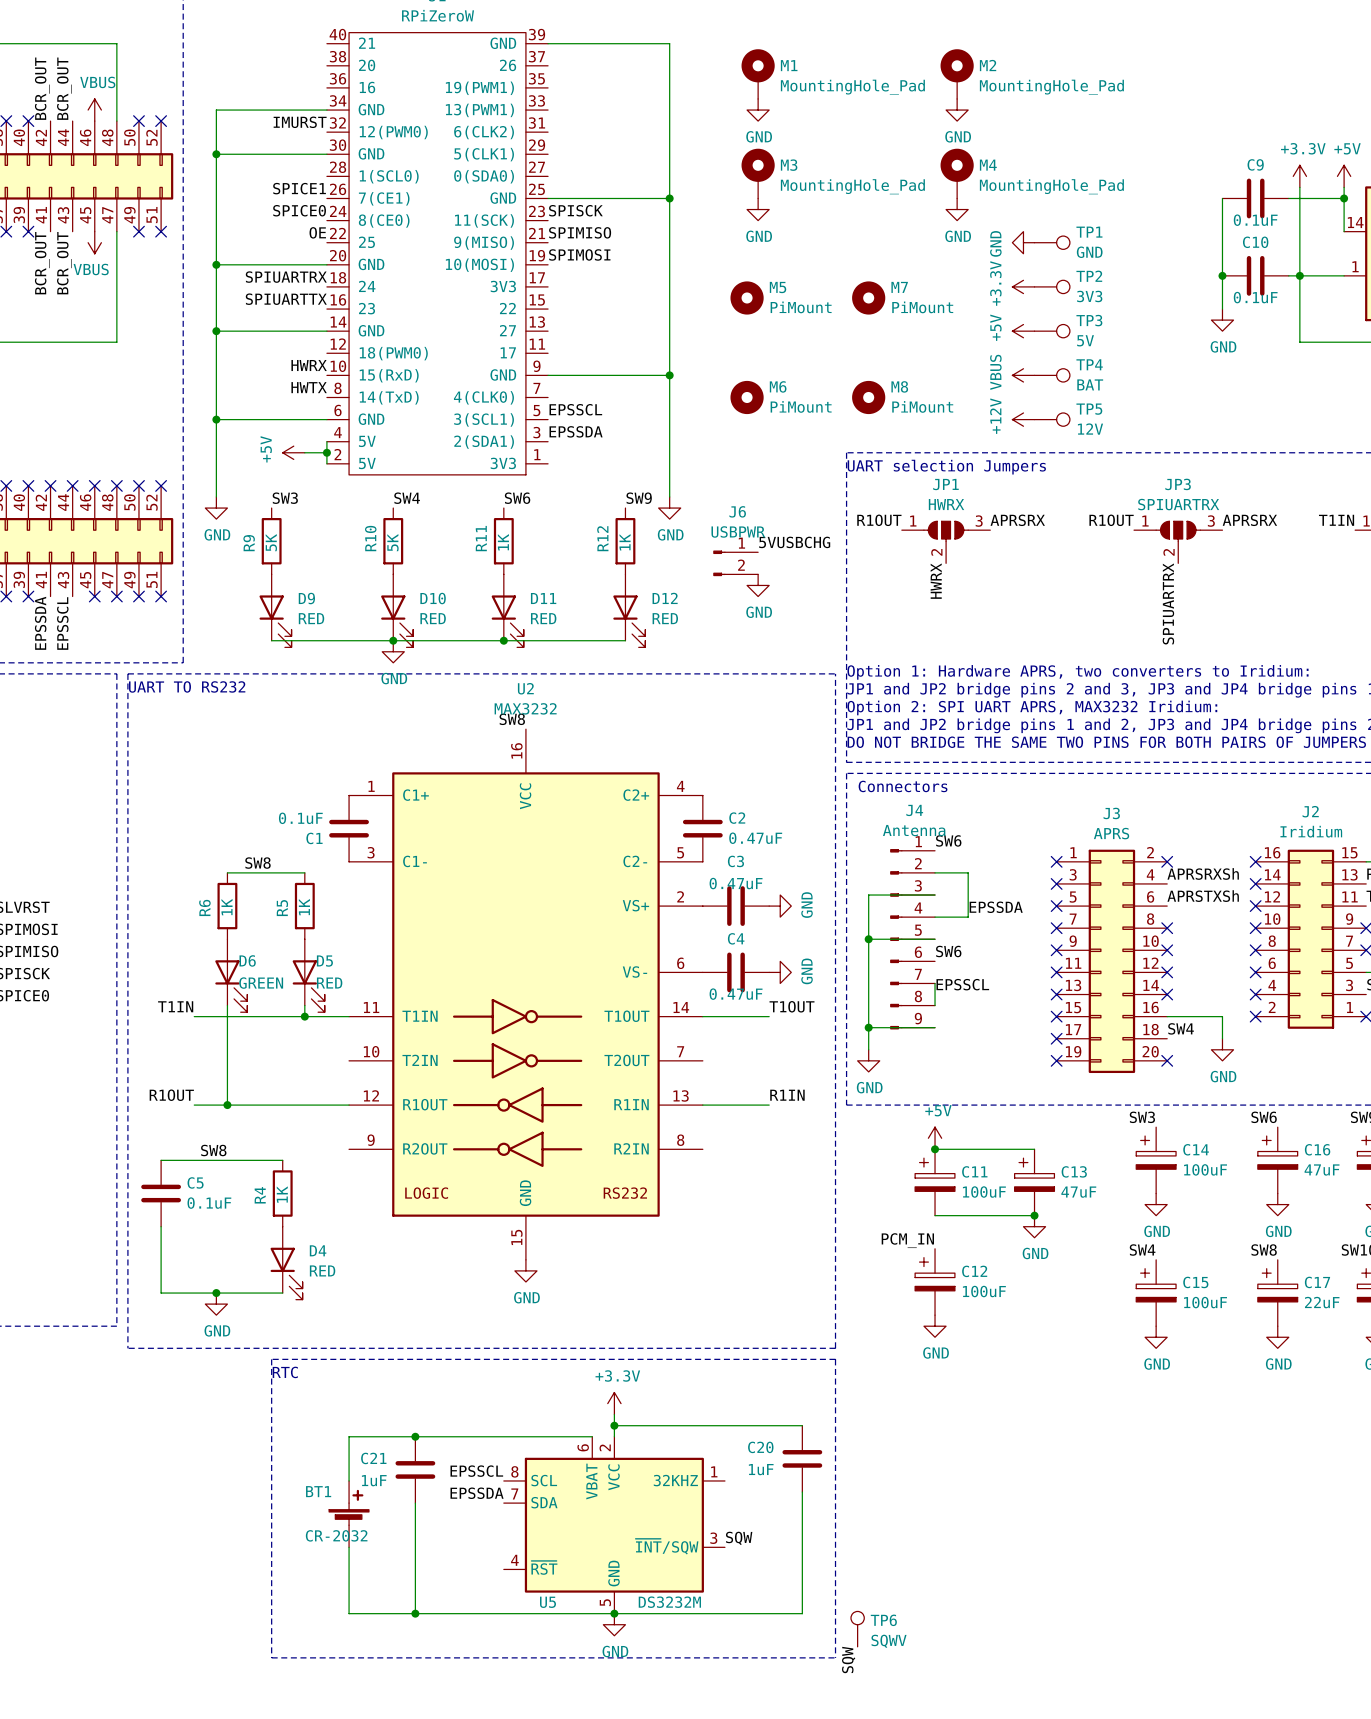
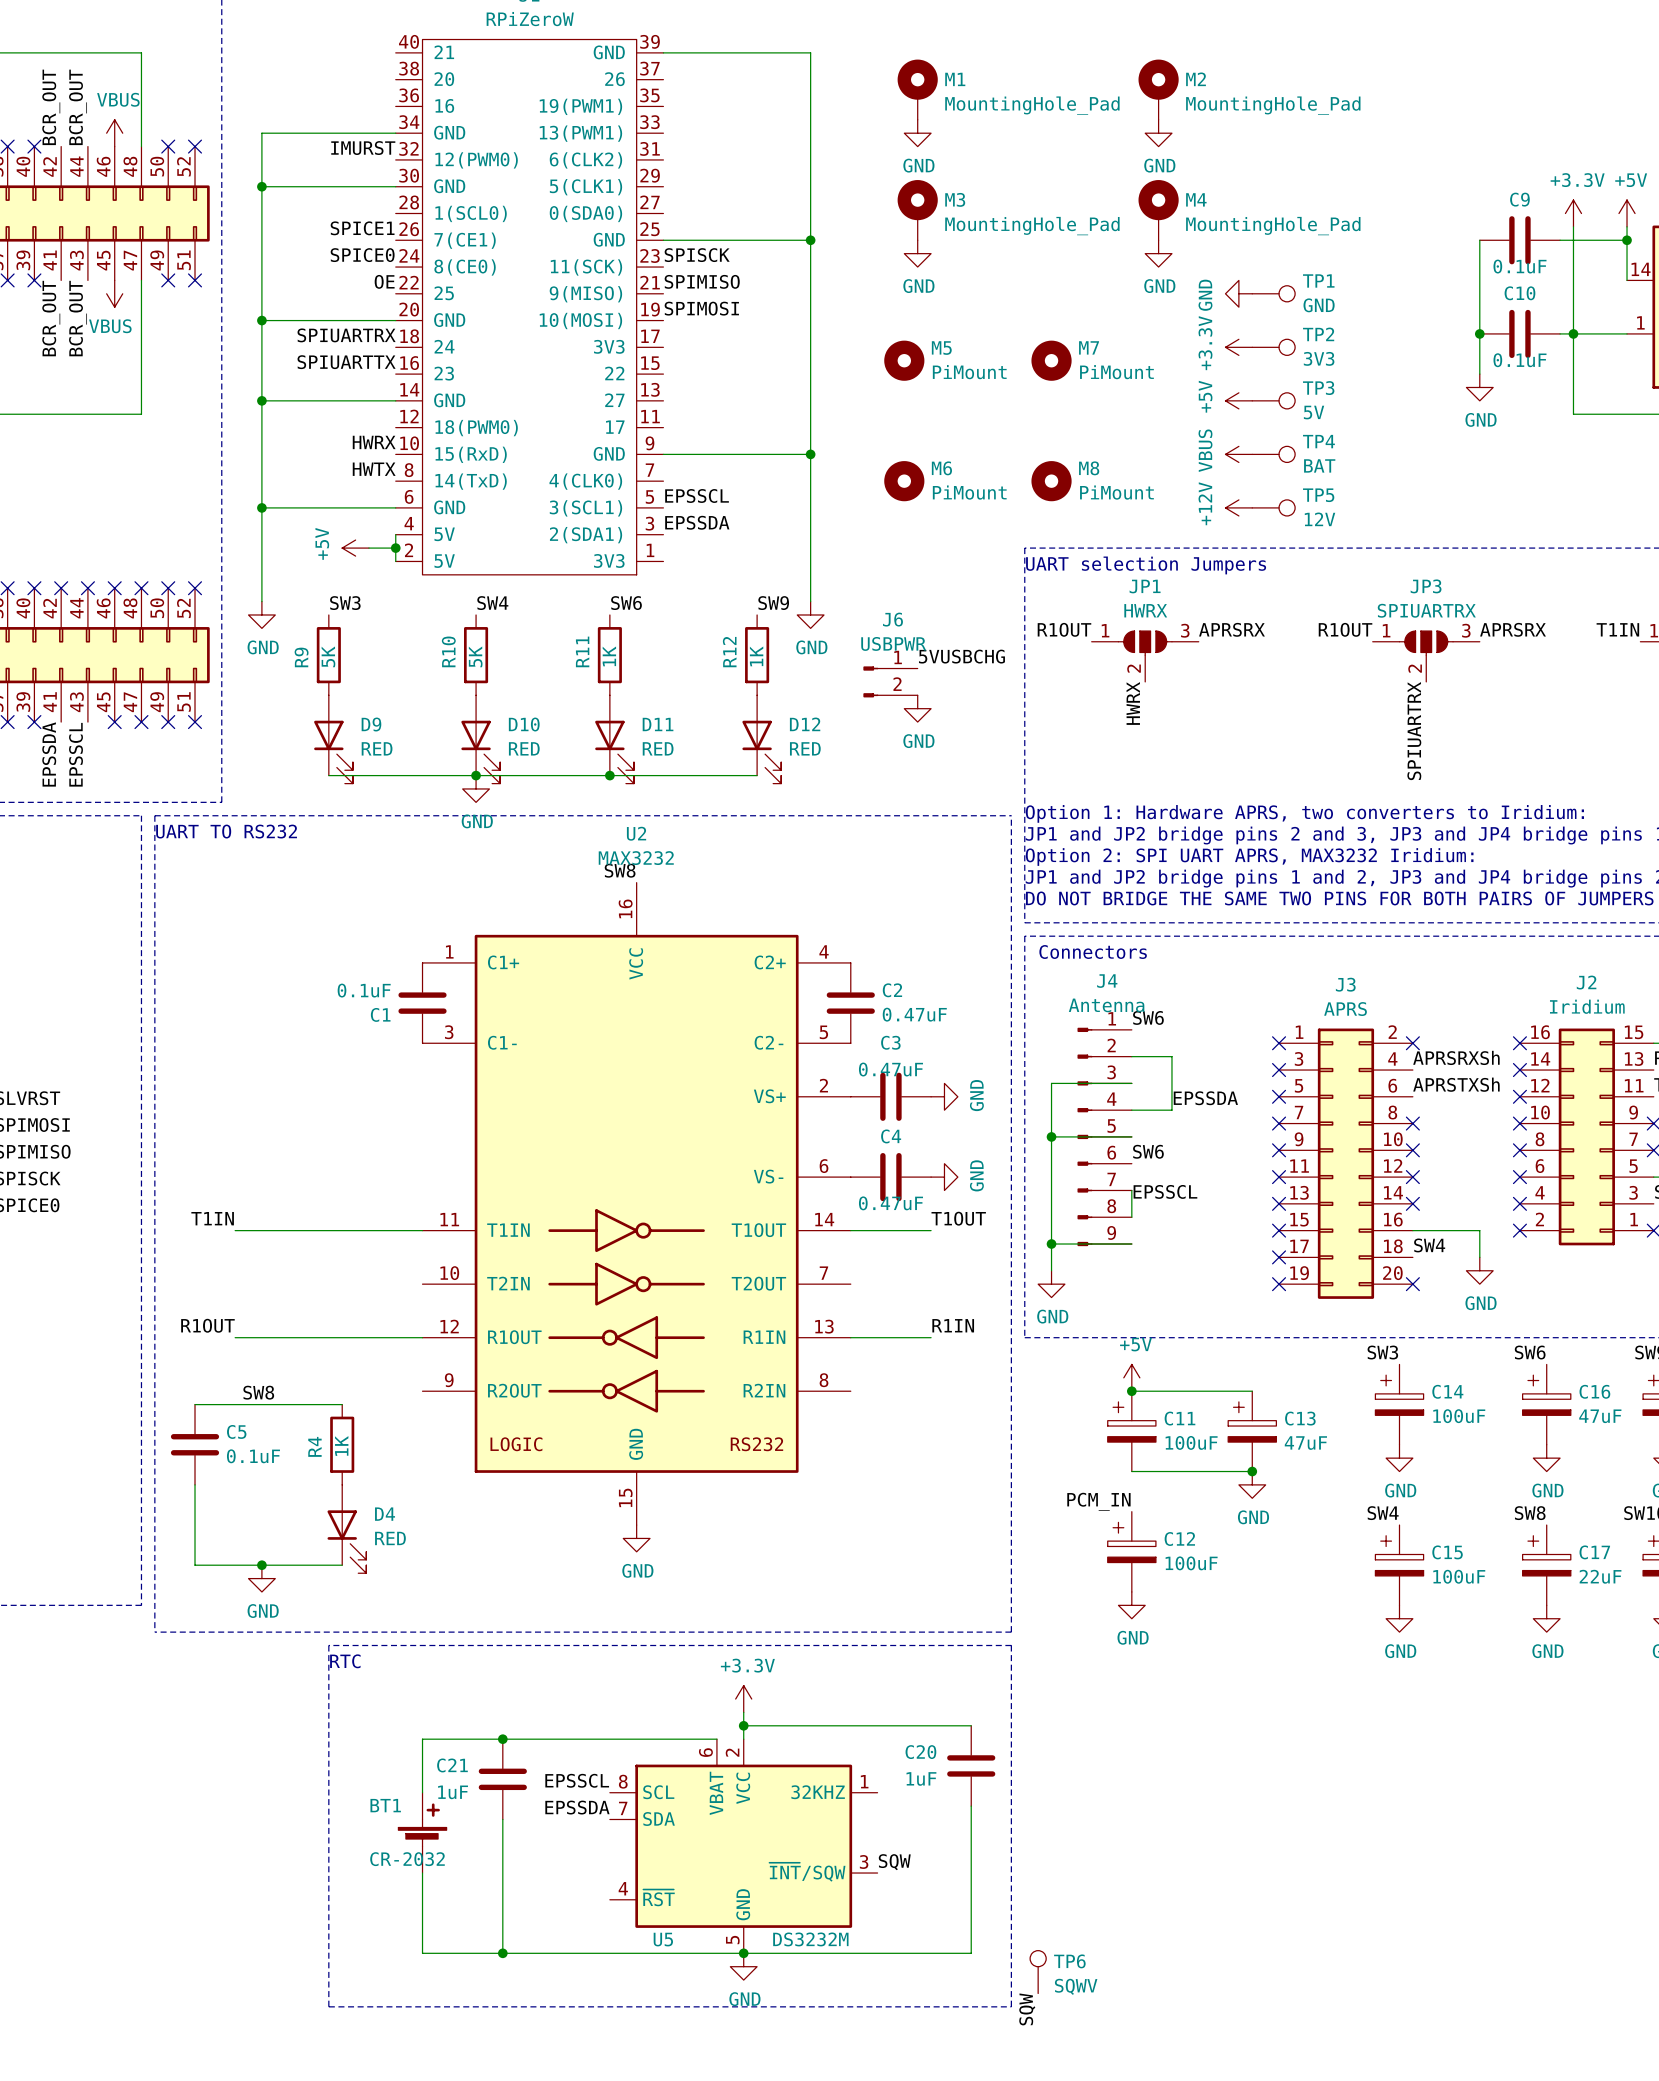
label: SW8 (257, 863) -> none
wire: (227, 872) (304, 872) -> none
R6: 1K (227, 906) -> none
R5: 1K (304, 906) -> none
D6: GREEN (231, 975) -> none
D5: RED (308, 975) -> none
wire: (227, 1005) (227, 1105) -> none
wire: (304, 1005) (304, 1016) -> none
junction: (304, 1016) -> none
junction: (227, 1105) -> none

